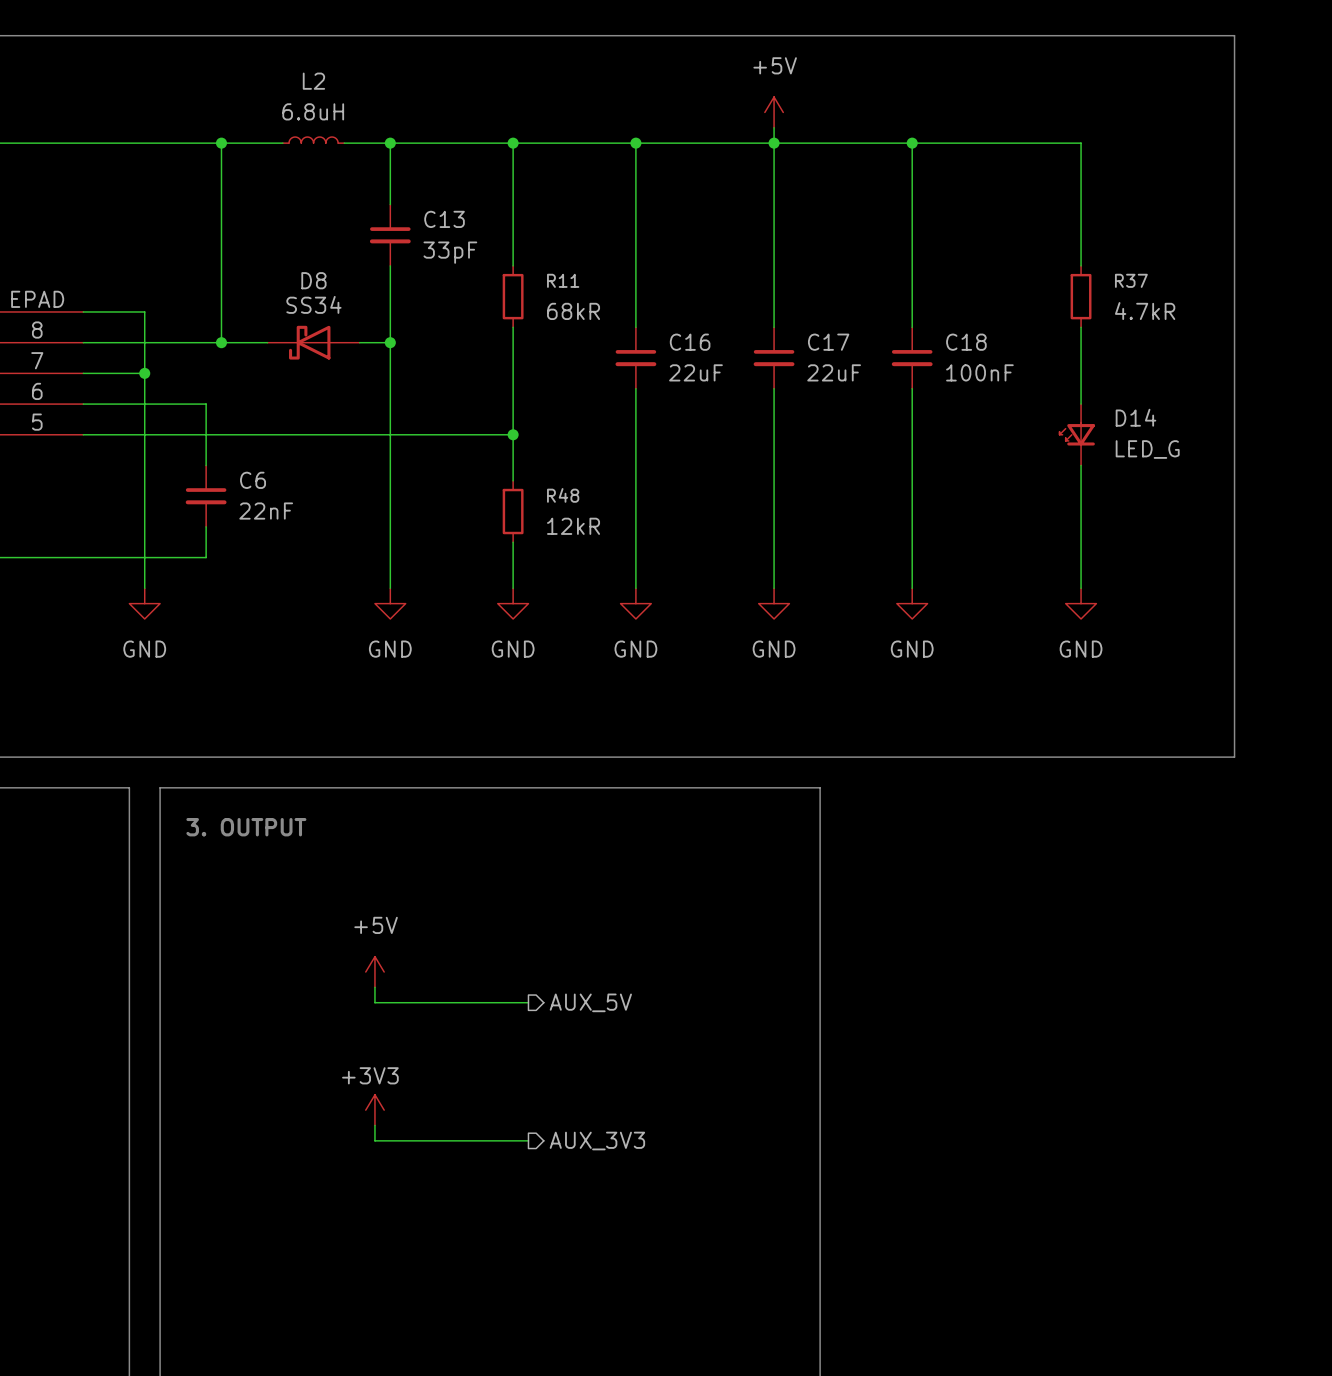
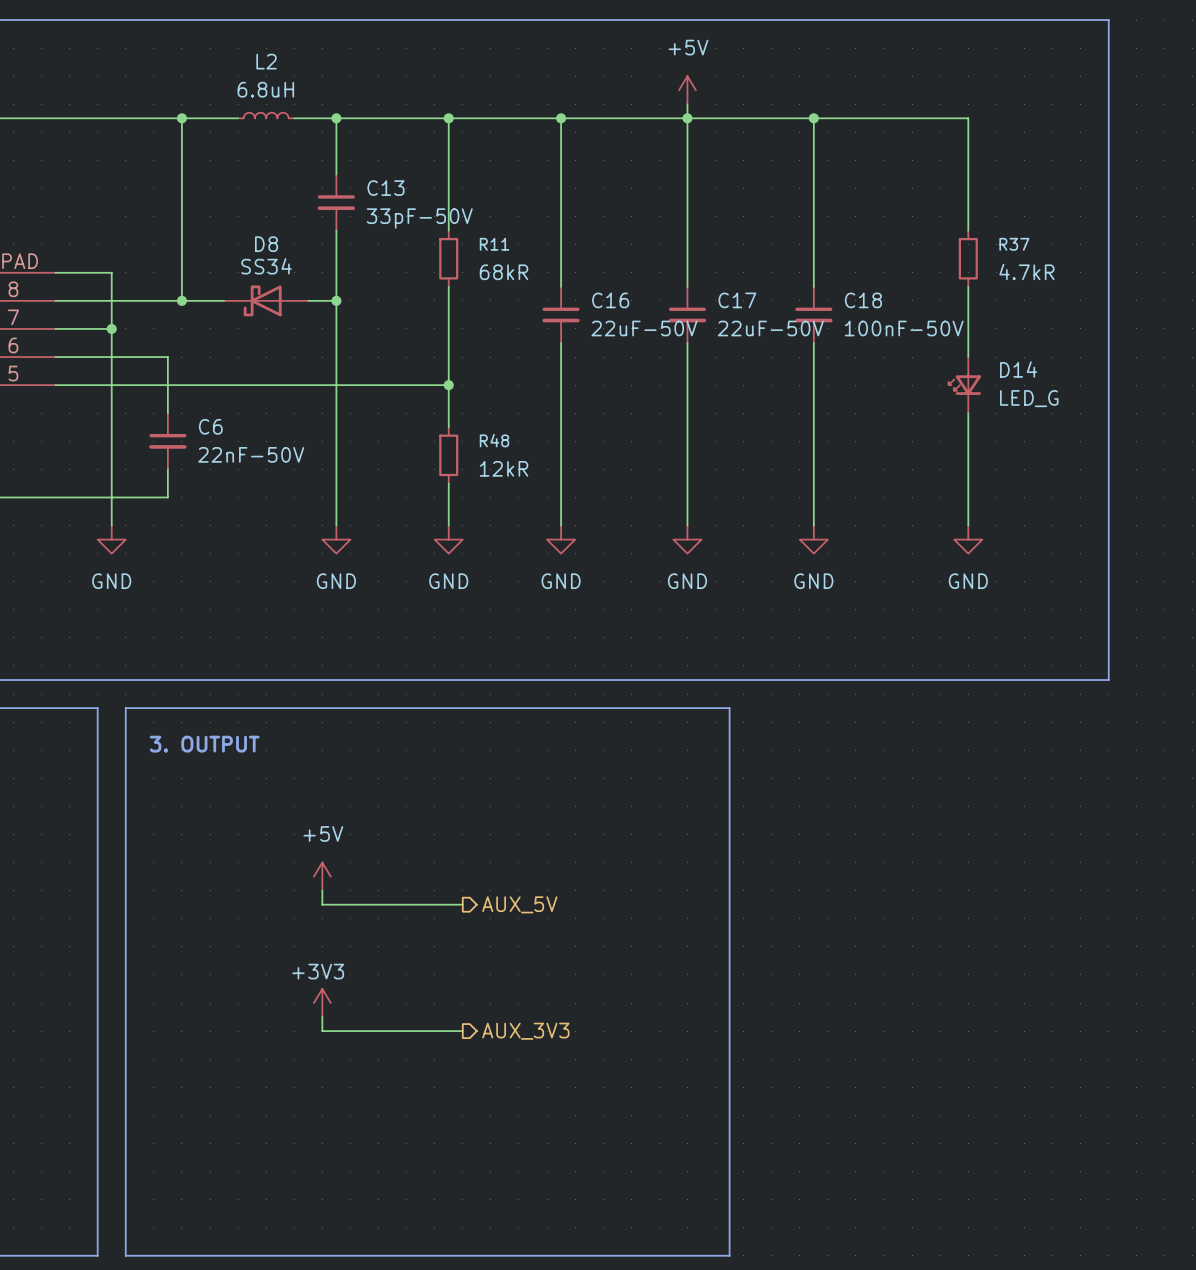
C13 value: 33pF (450, 252) -> 33pF-50V (419, 218)
C16 value: 22uF (695, 372) -> 22uF-50V (644, 328)
C17 value: 22uF (834, 372) -> 22uF-50V (770, 328)
C18 value: 100nF (979, 372) -> 100nF-50V (904, 328)
C6 value: 22nF (266, 511) -> 22nF-50V (251, 454)

